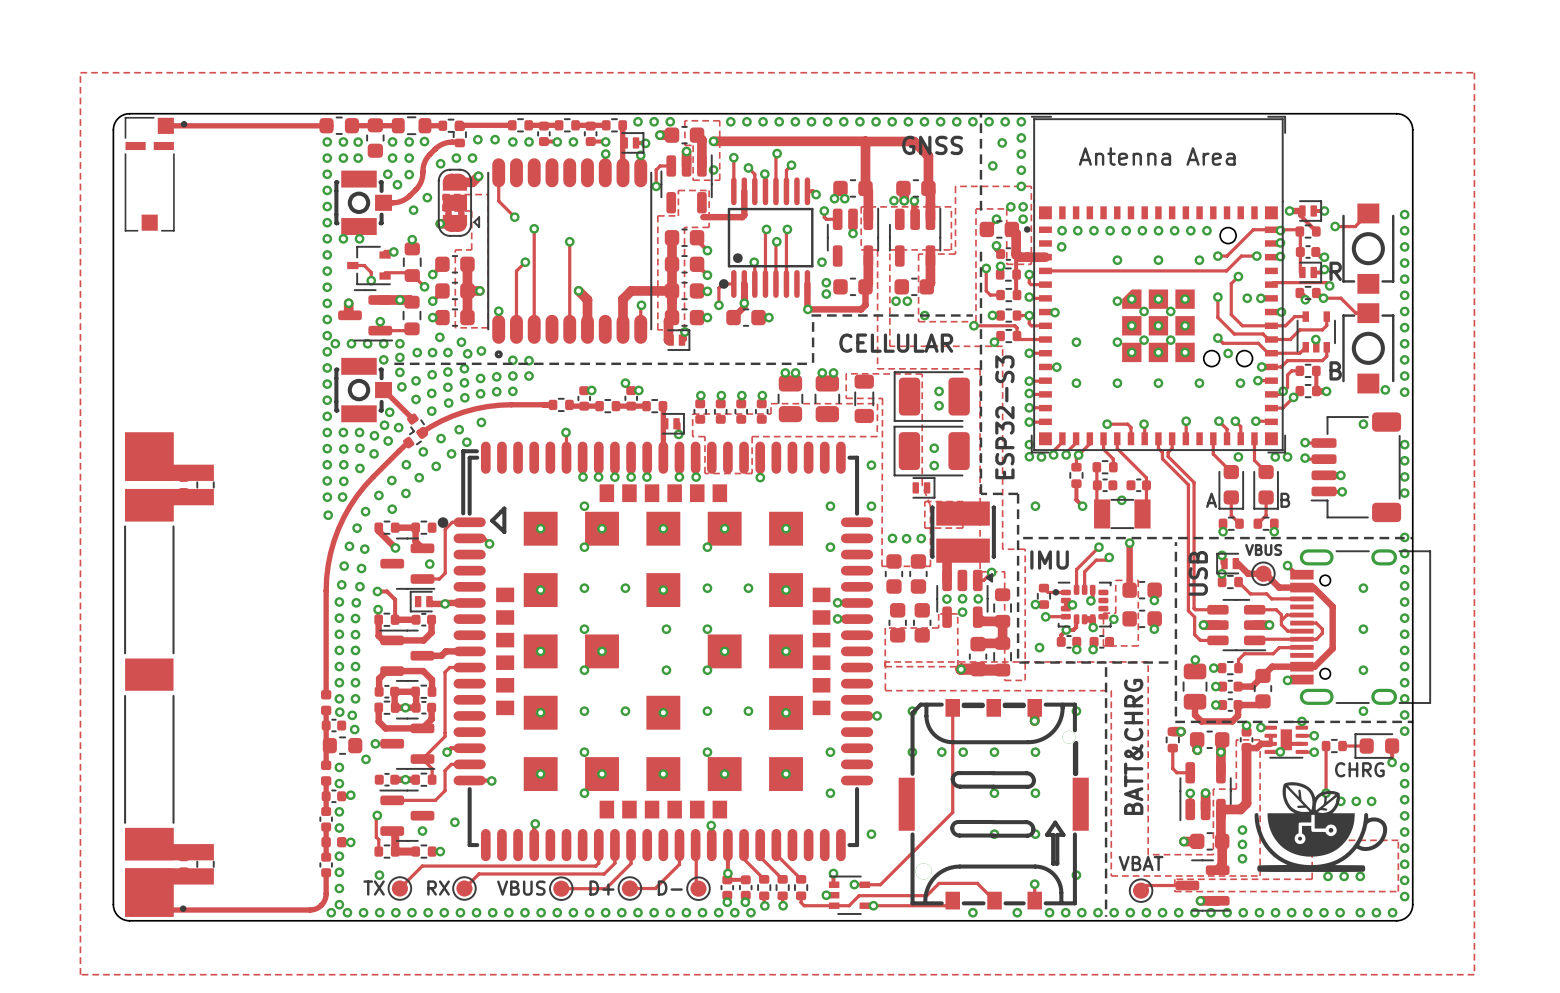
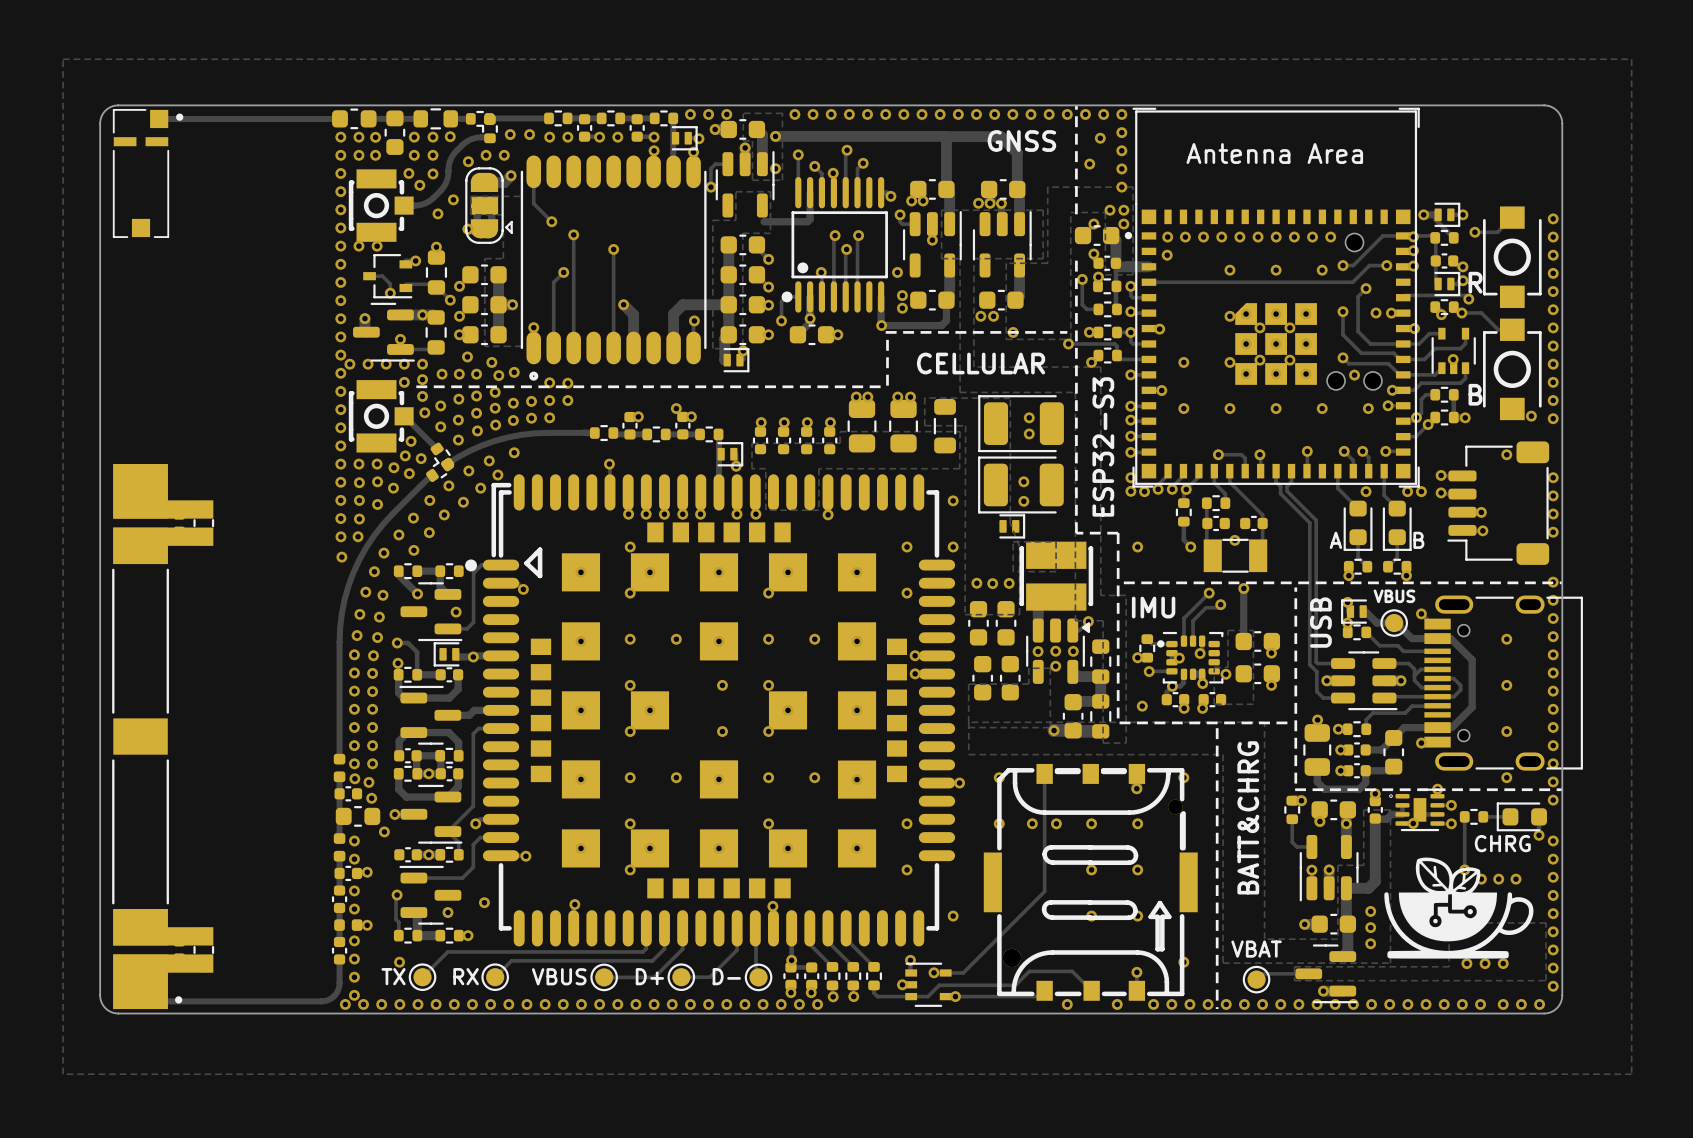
drawing: none -> [1389, 794, 1393, 798]
via: (1260, 727) -> none

